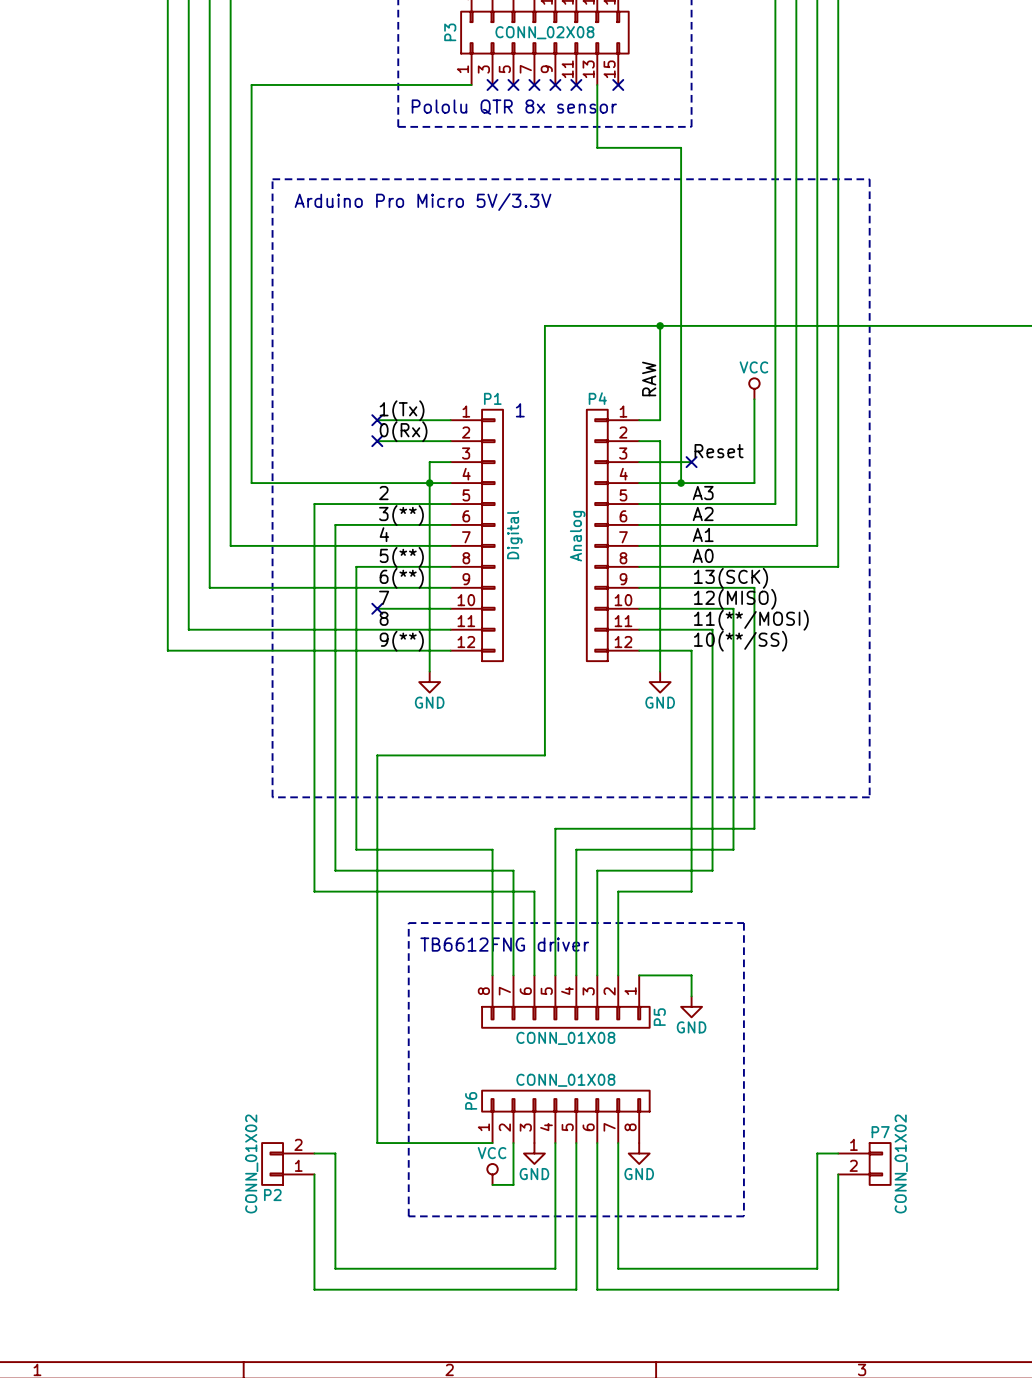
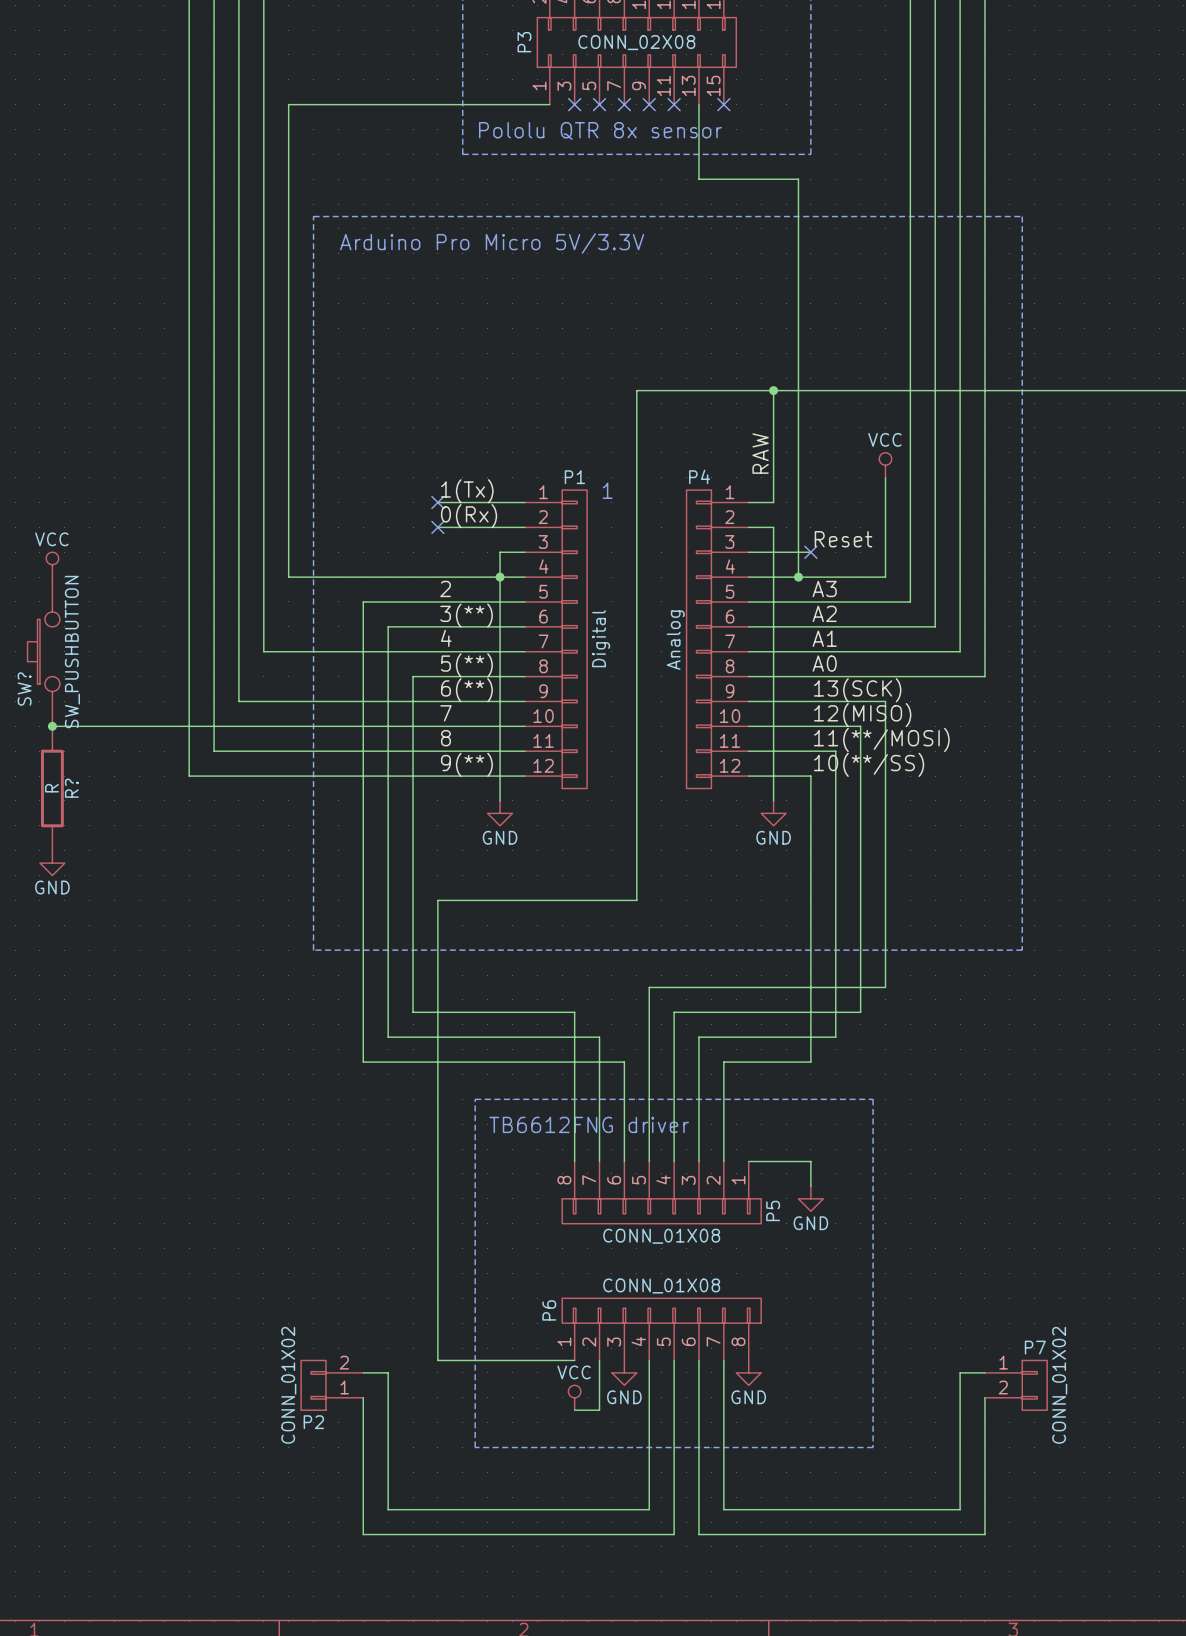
power symbol: none -> VCC (52, 564)
SW?: none -> SW_PUSHBUTTON (43, 651)
wire: none -> (52, 726) (437, 726)
junction: none -> (52, 726)
no-connect mark: (377, 608) -> none
R?: none -> R (52, 788)
power symbol: none -> GND (52, 863)

